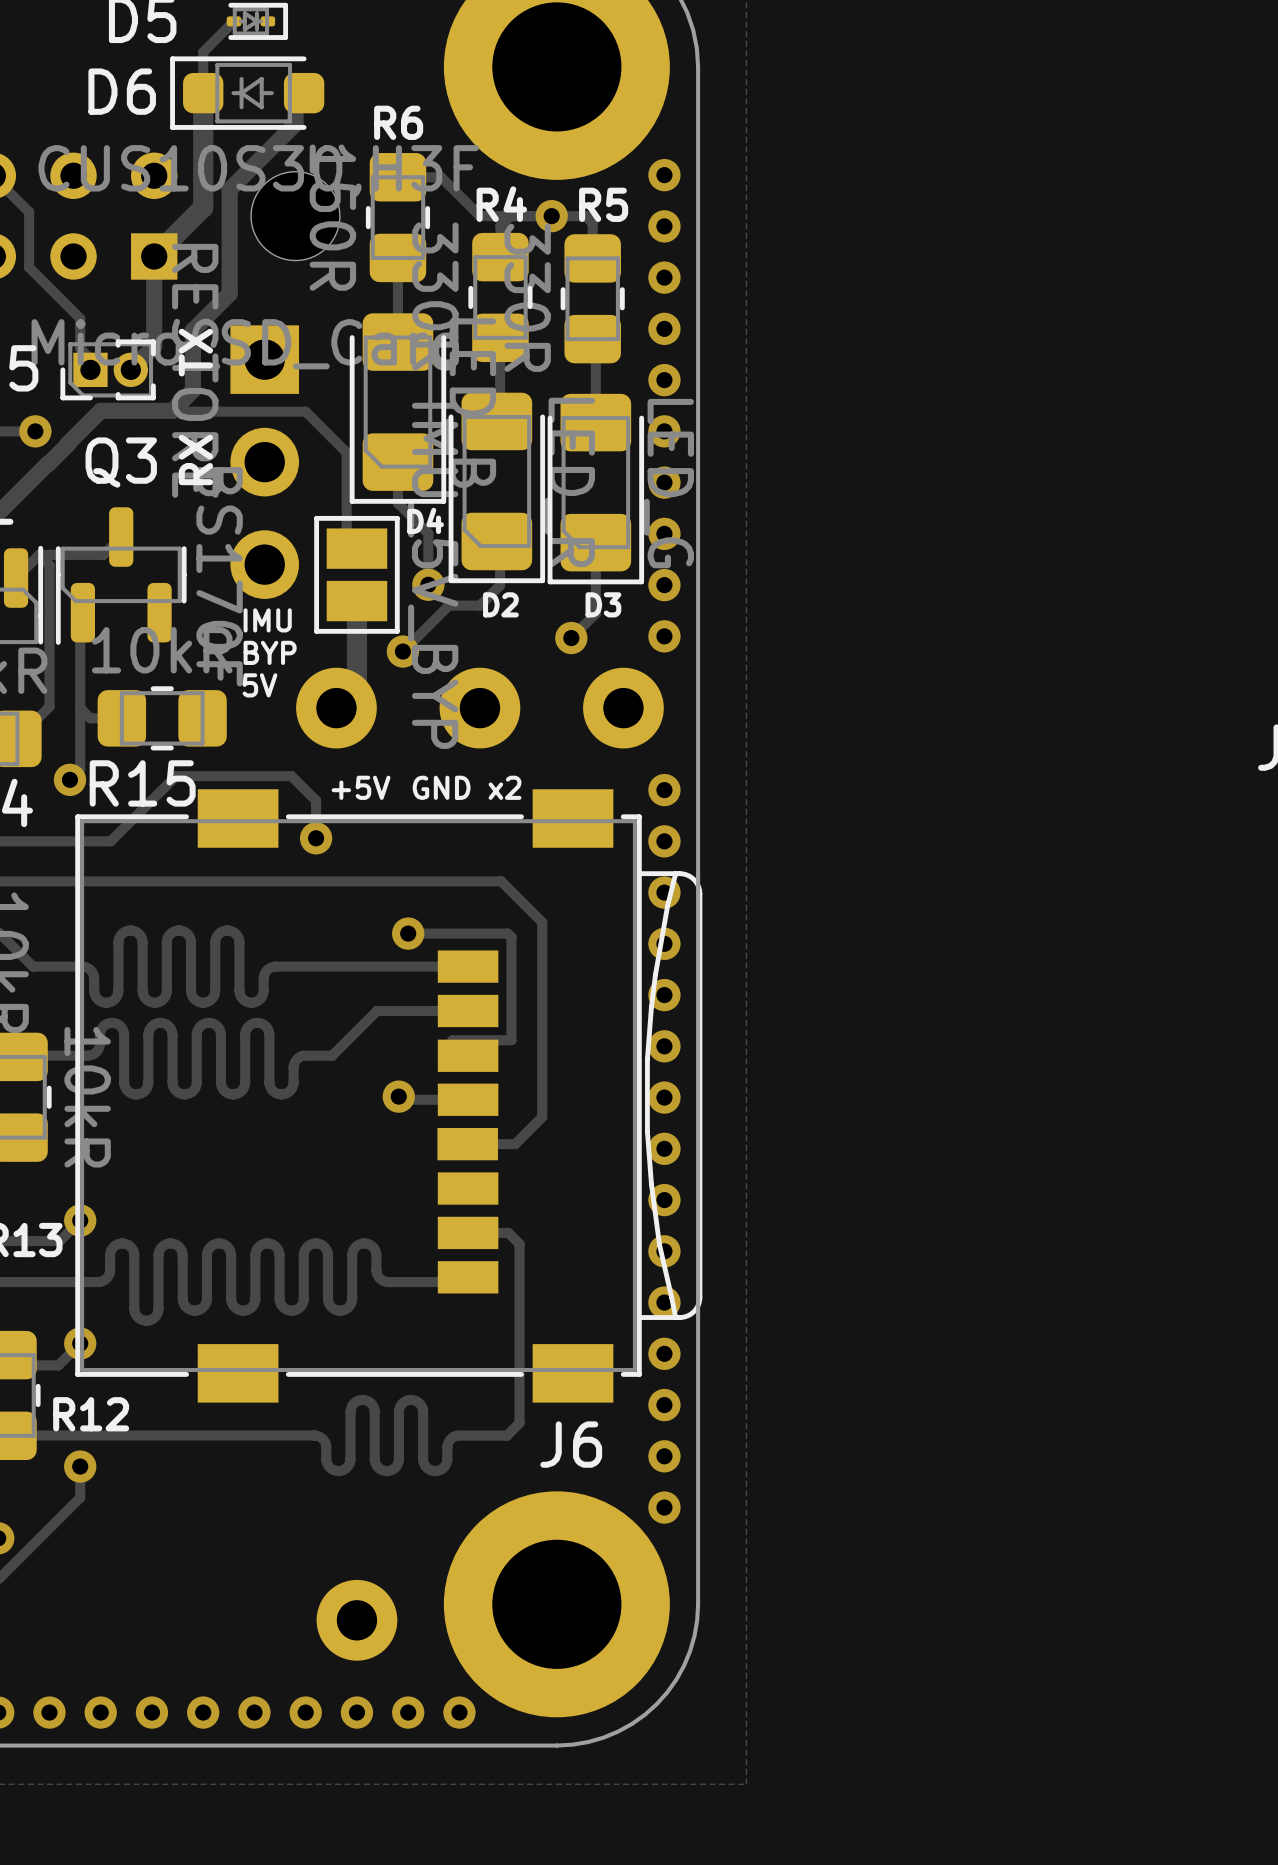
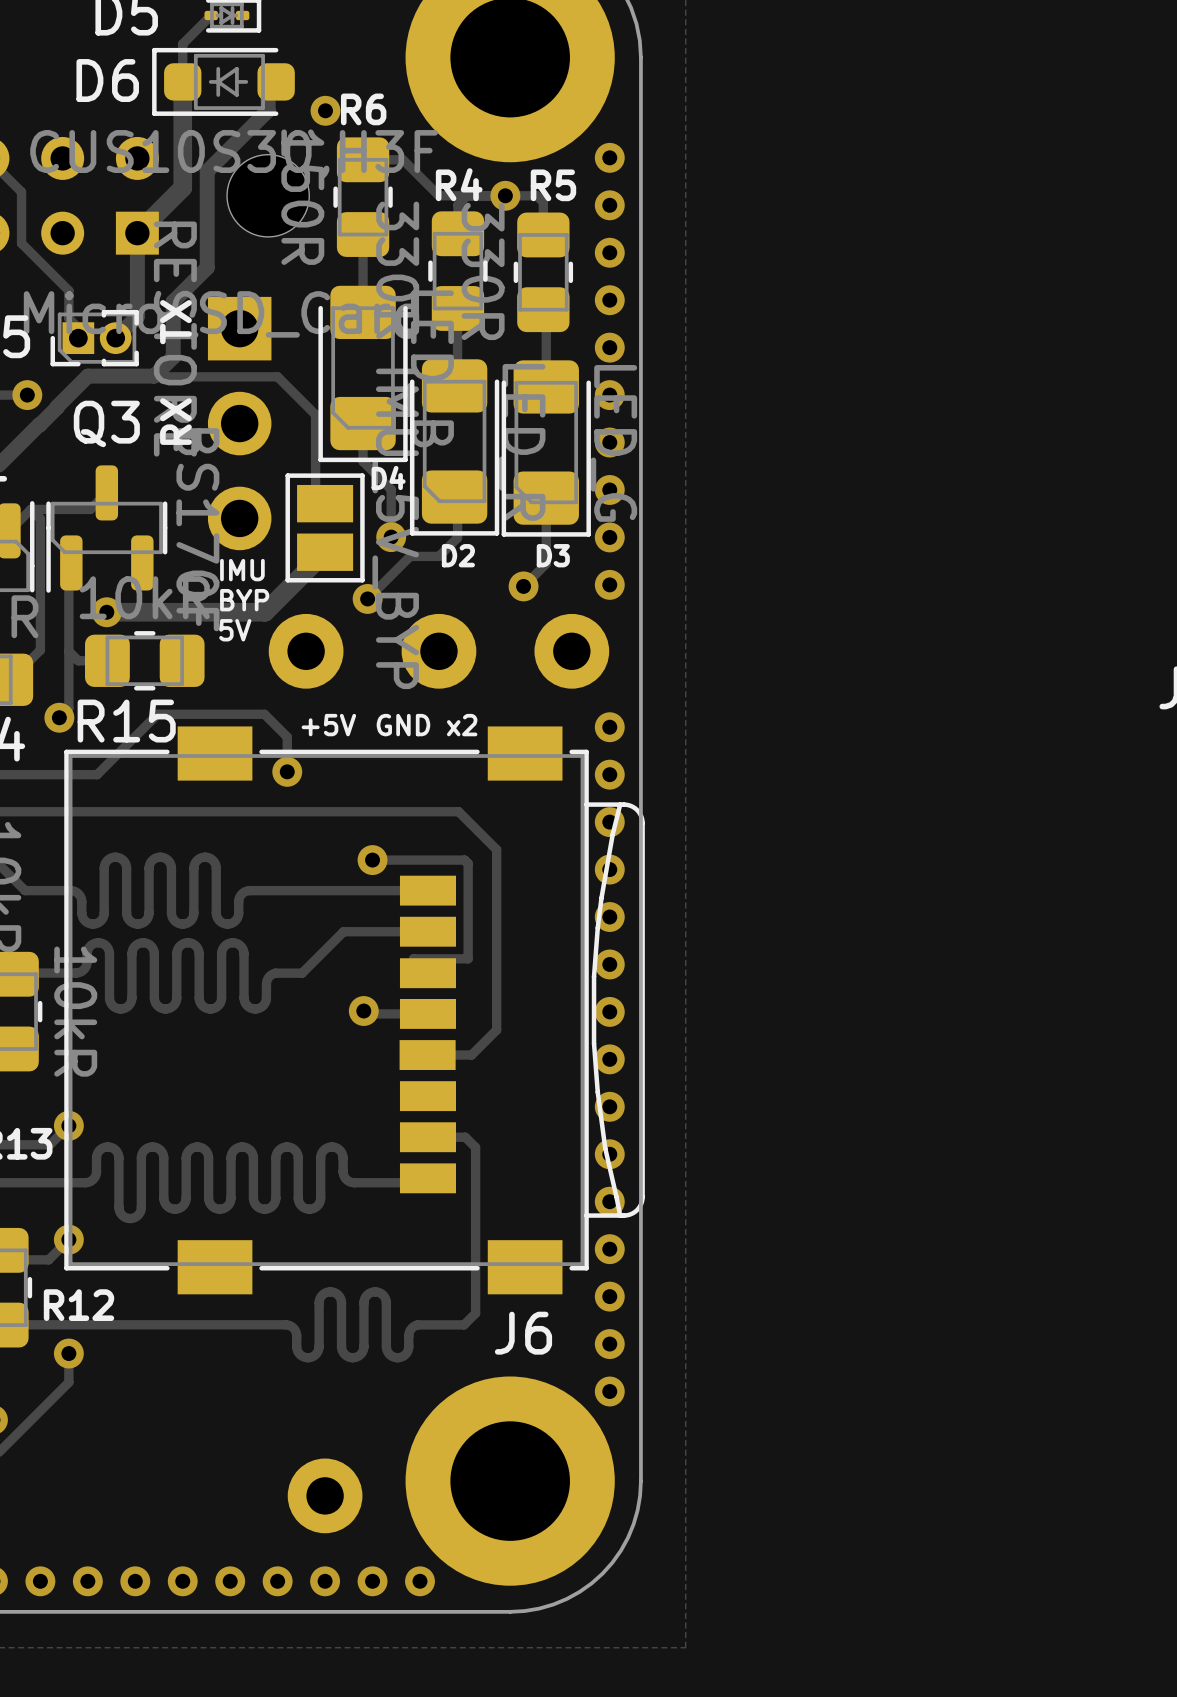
via: none -> (325, 110)
track: (356, 601) (356, 687) -> (325, 552) (265, 612) (106, 612)
via: none -> (106, 612)

